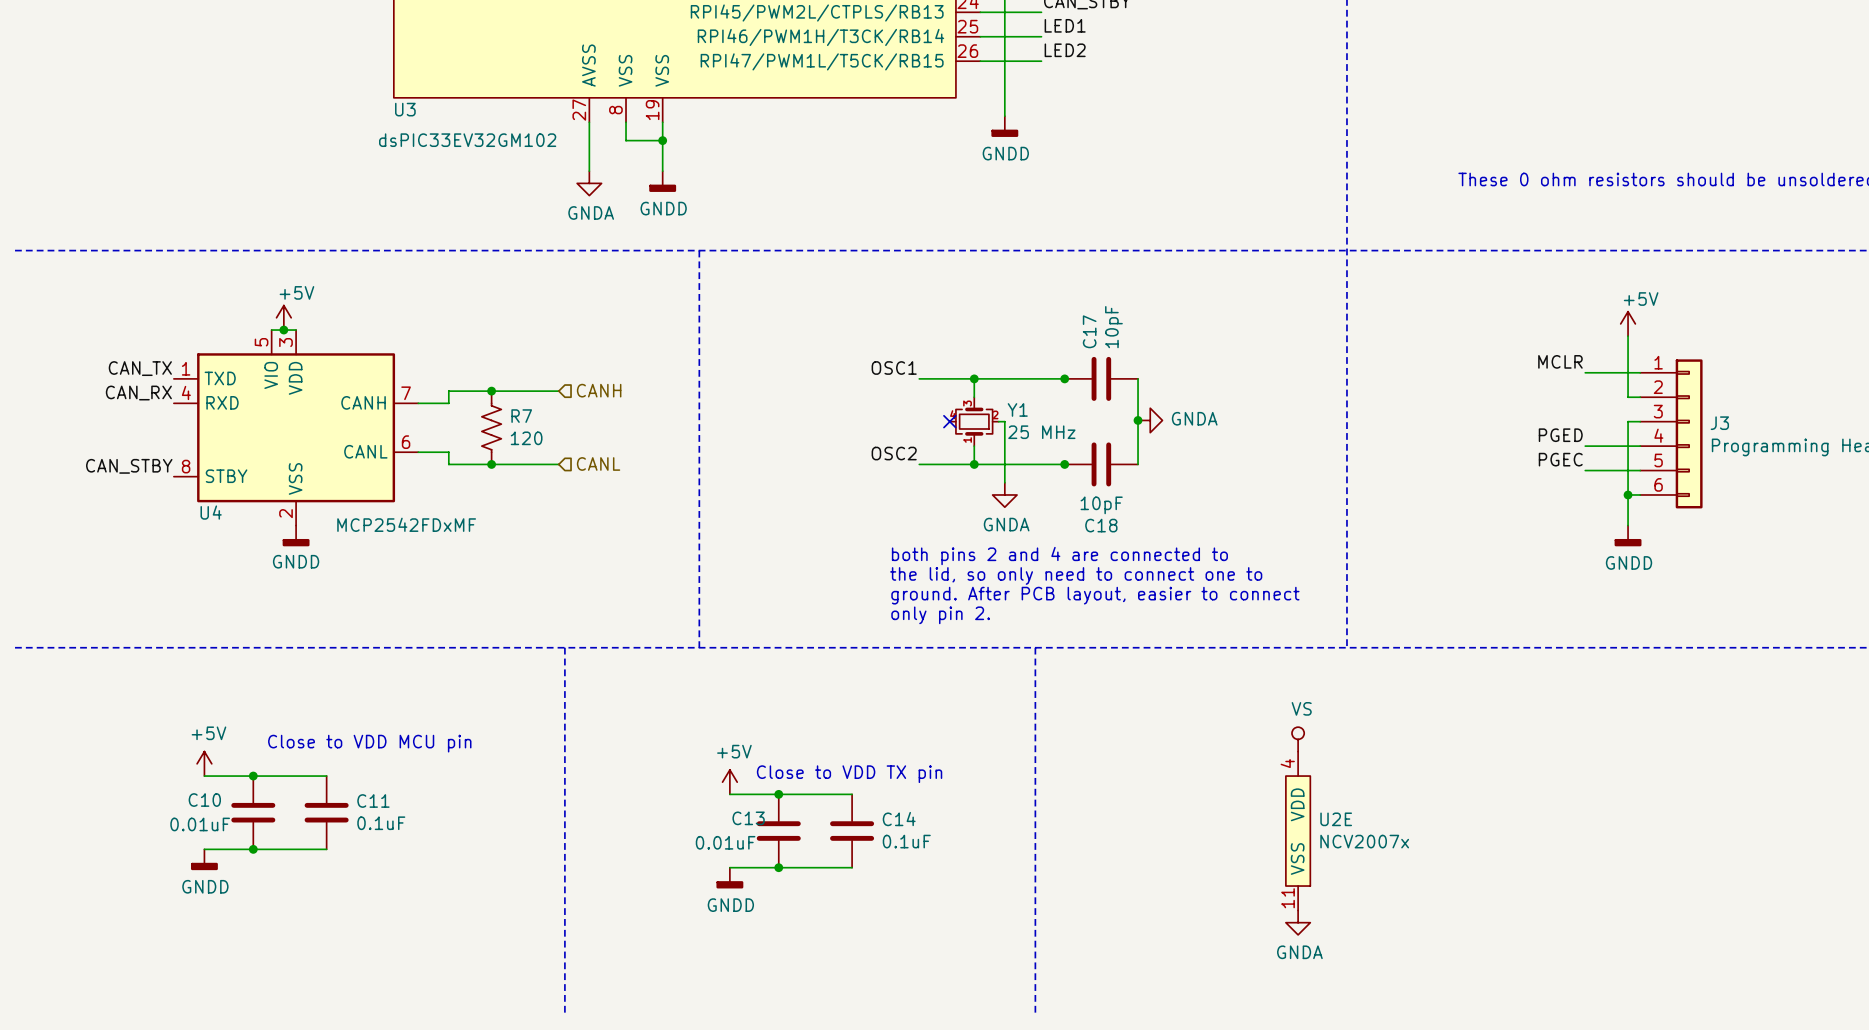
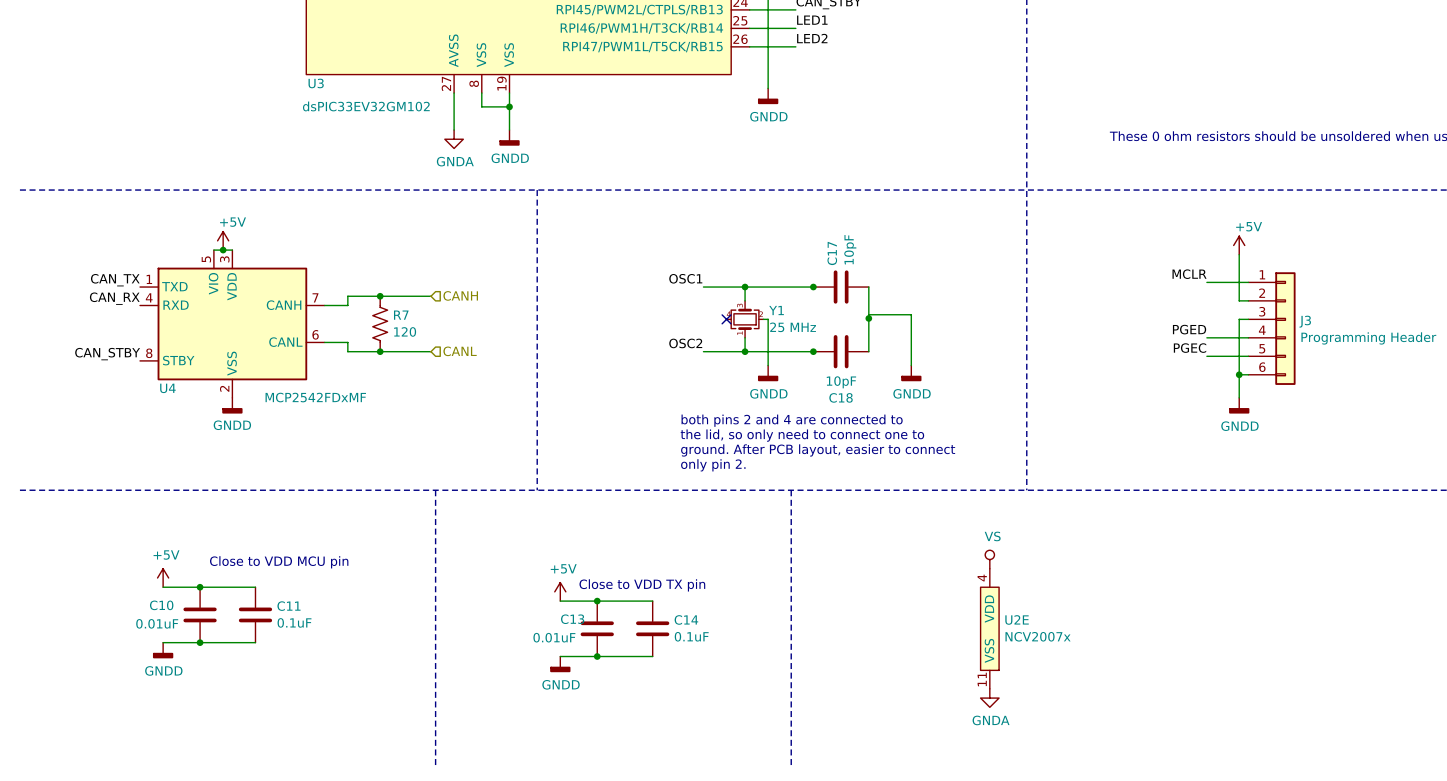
wire: none -> (868, 314) (911, 314) (911, 365)
power symbol: GNDA (1150, 420) -> none
power symbol: none -> GNDD (911, 373)
power symbol: GNDA (1004, 494) -> GNDD (768, 373)

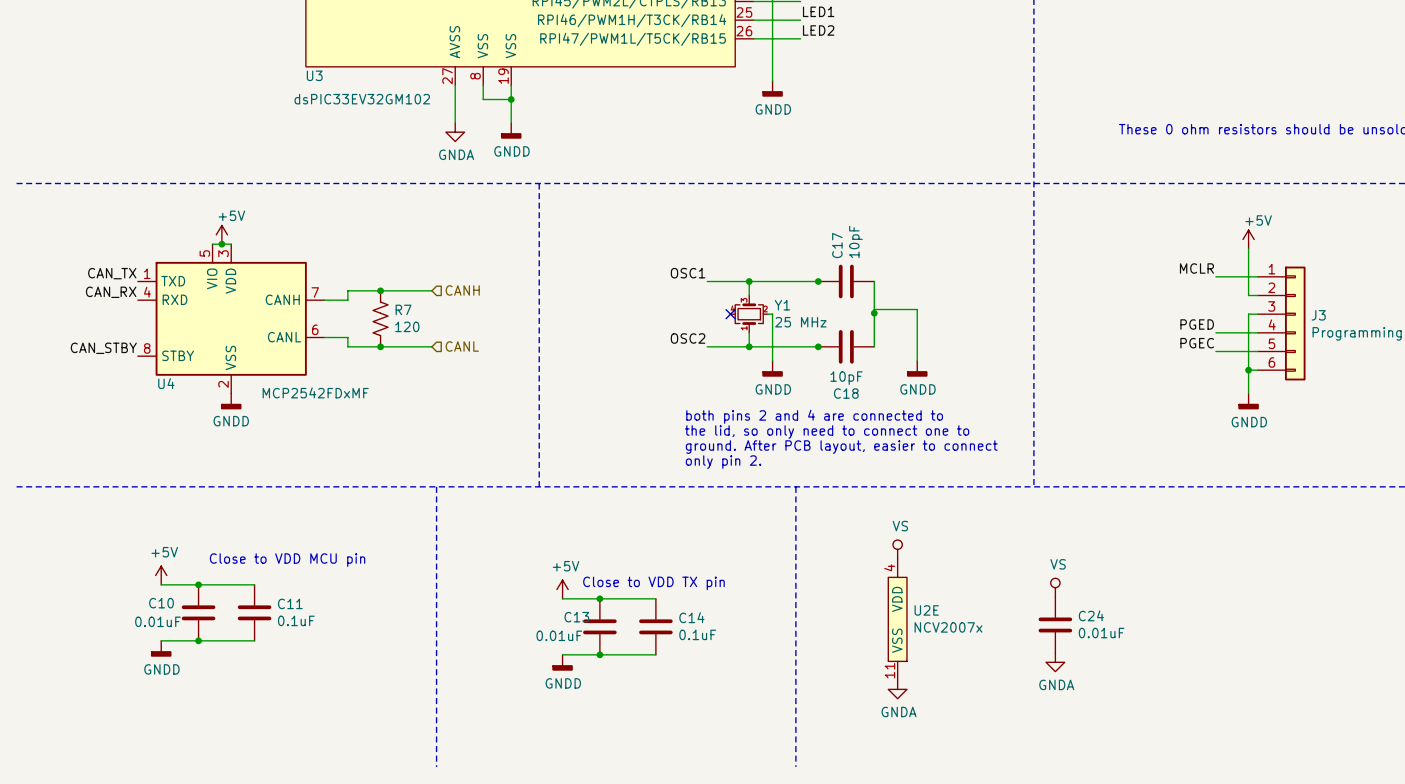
power symbol: none -> VS (897, 549)
power symbol: VS (989, 559) -> none
power symbol: none -> VS (1055, 587)
C24: none -> 0.01uF (1055, 624)
U2E position: (989, 628) -> (897, 619)
power symbol: none -> GNDA (1055, 662)
power symbol: none -> GNDA (897, 689)
power symbol: GNDA (989, 698) -> none

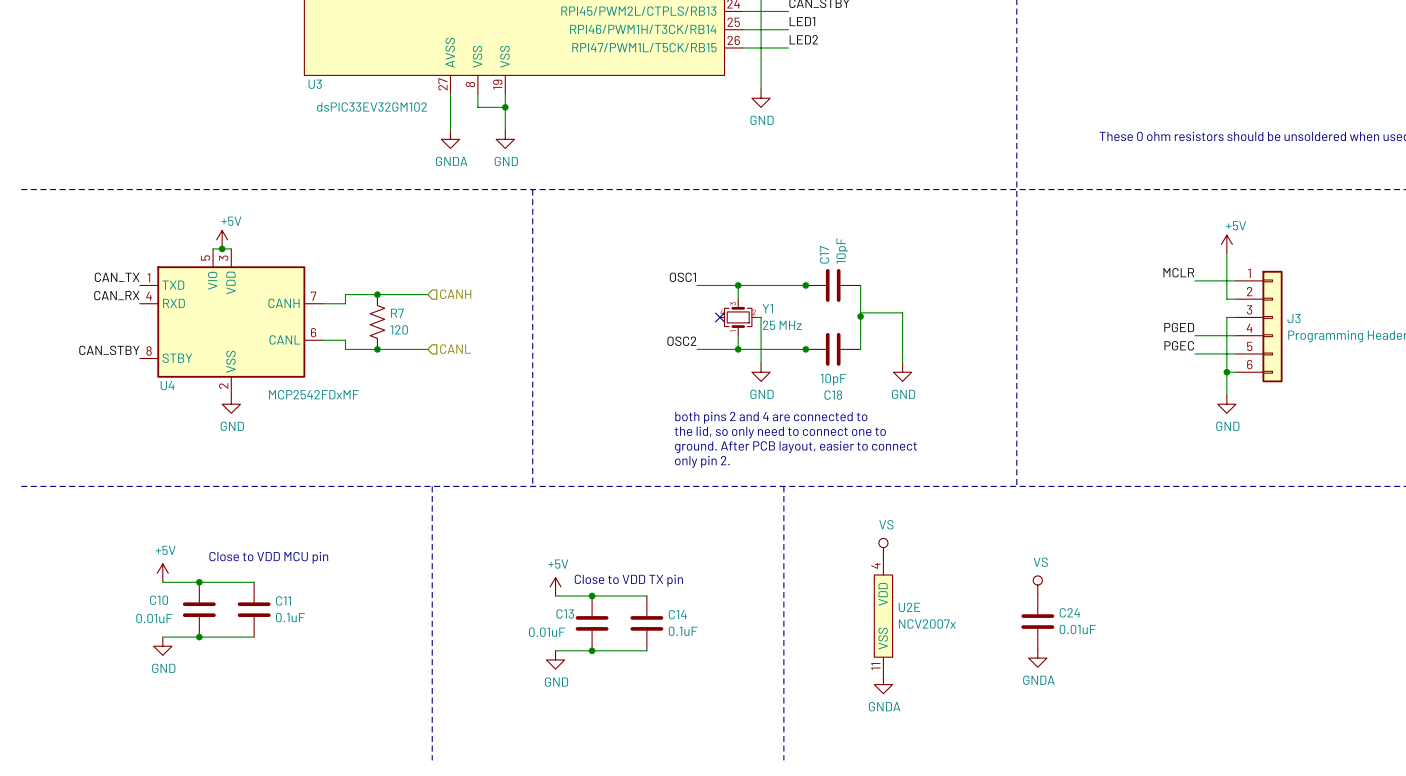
power symbol: GNDD (772, 88) -> GND (761, 98)
power symbol: GNDD (511, 130) -> GND (505, 139)
power symbol: GNDD (772, 368) -> GND (761, 372)
power symbol: GNDD (917, 368) -> GND (902, 372)
power symbol: GNDD (231, 401) -> GND (231, 404)
power symbol: GNDD (1248, 401) -> GND (1226, 404)
power symbol: GNDD (161, 648) -> GND (162, 646)
power symbol: GNDD (562, 662) -> GND (555, 659)

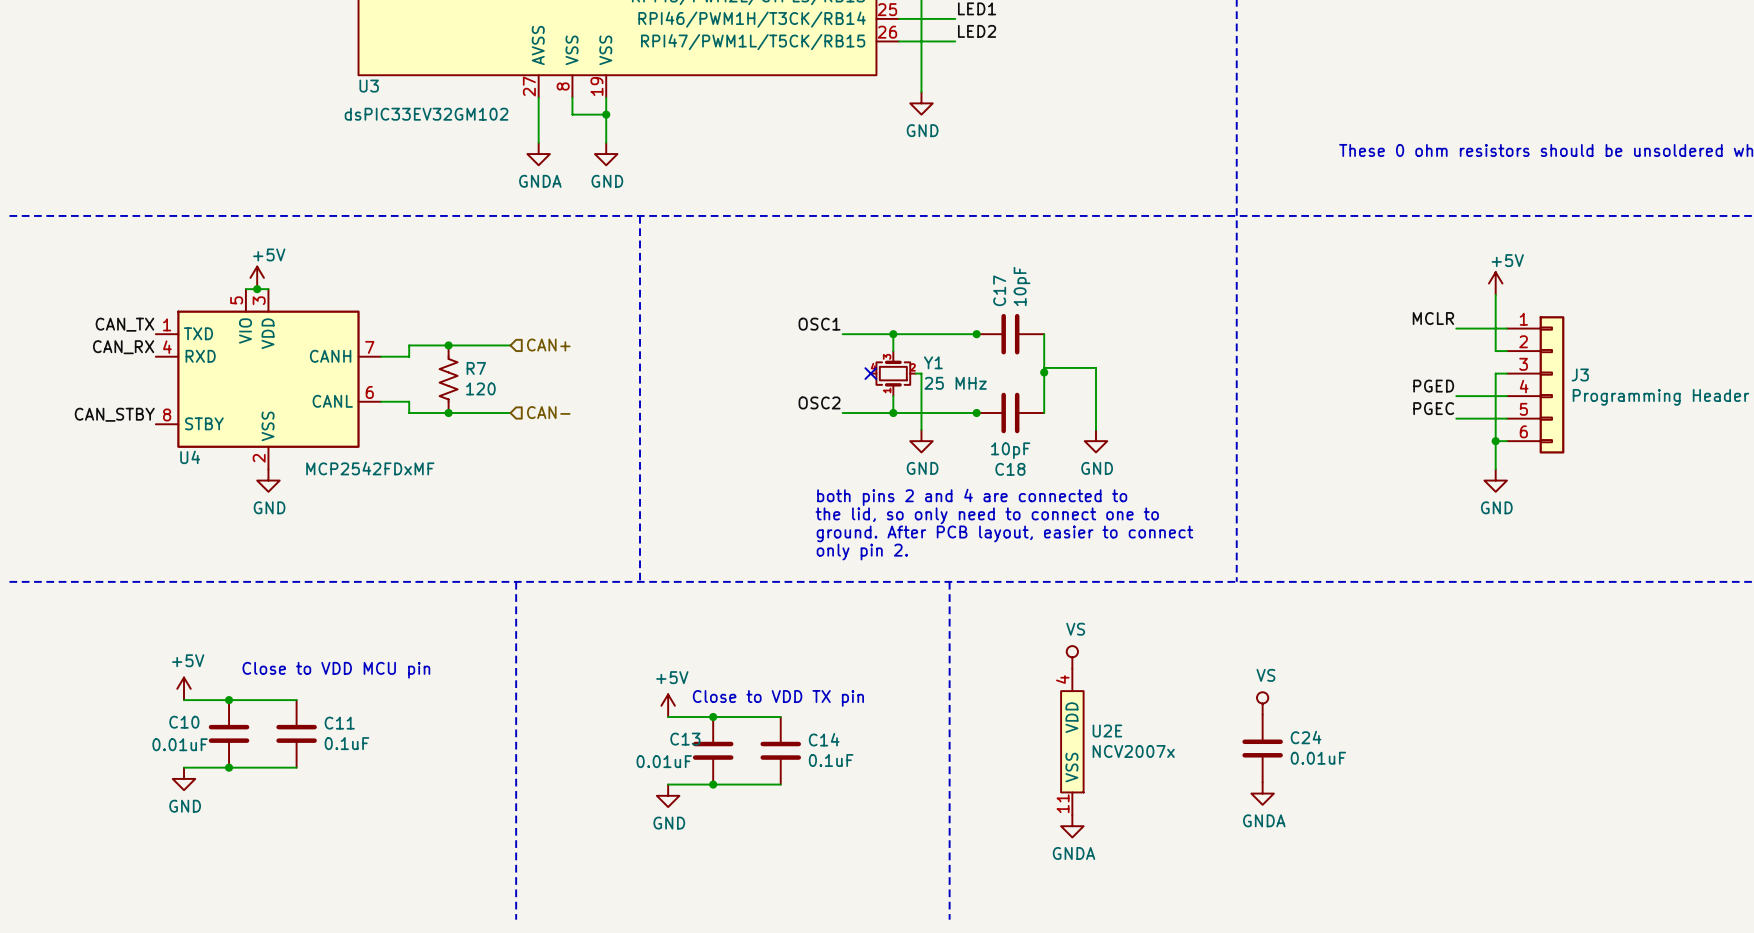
hierarchical label: CANH (455, 294) -> CAN+ (548, 345)
hierarchical label: CANL (455, 349) -> CAN- (548, 412)

